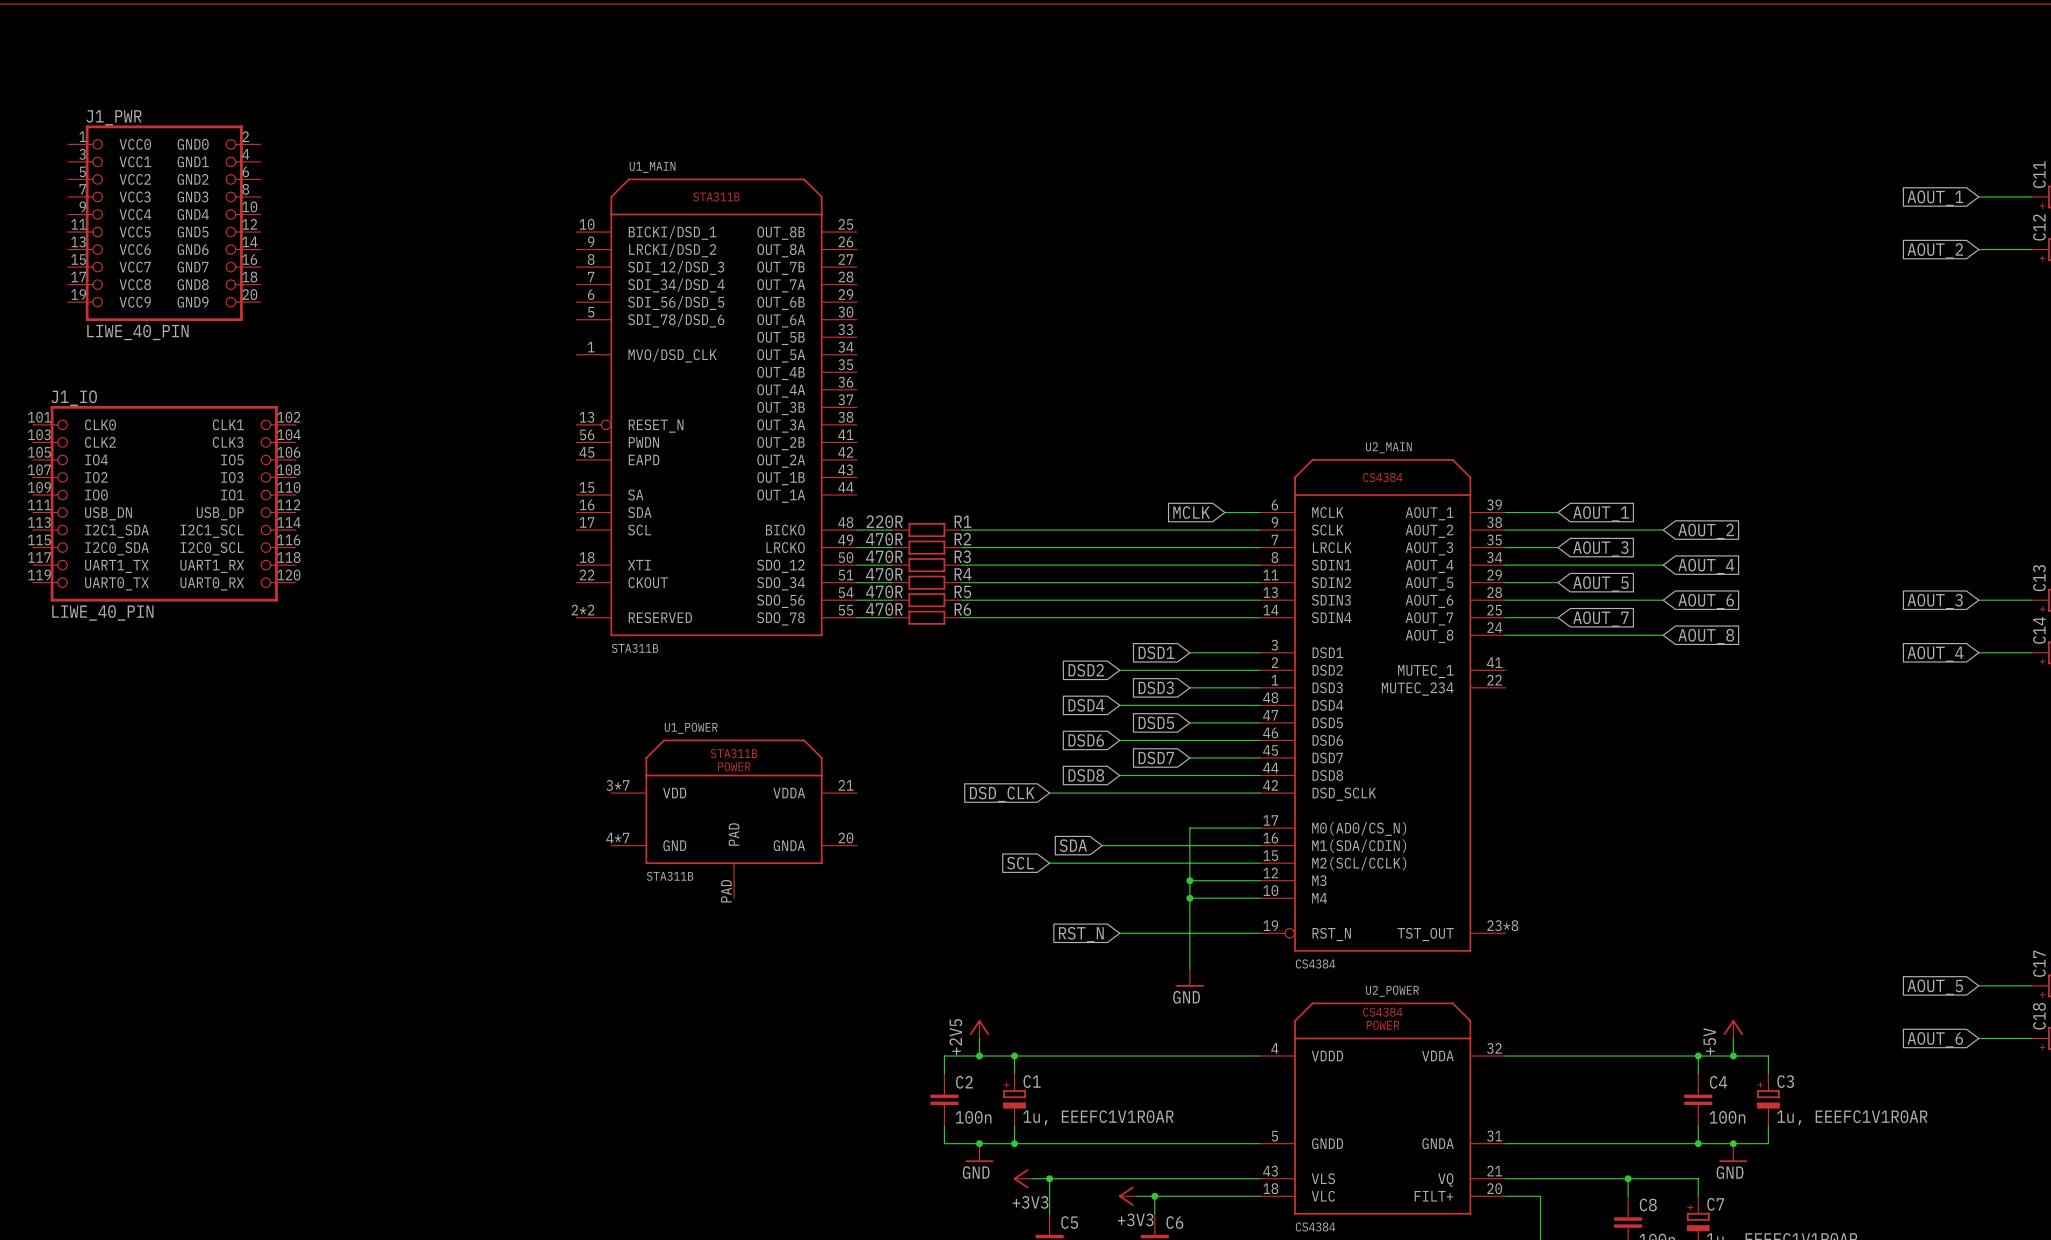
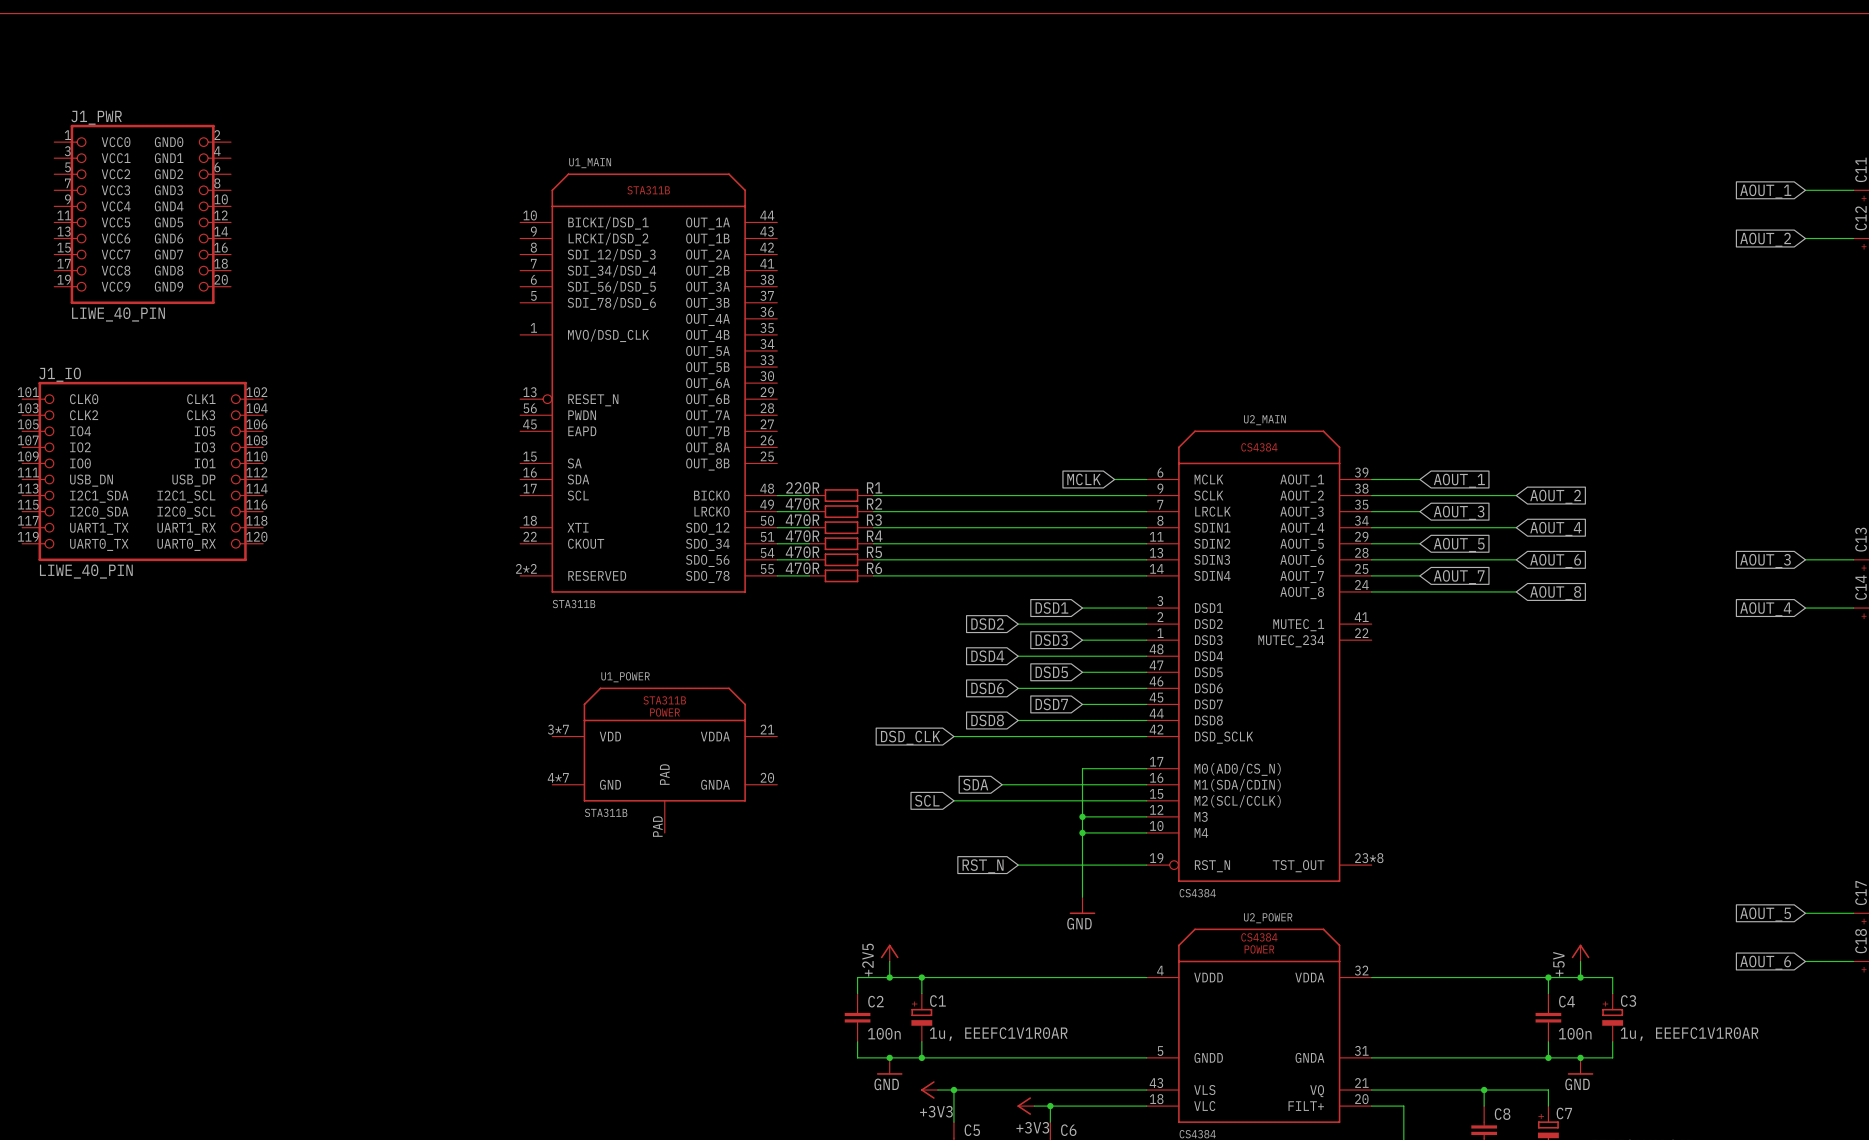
U1_MAIN symbol: [576, 178, 857, 637] -> [520, 173, 778, 593]

